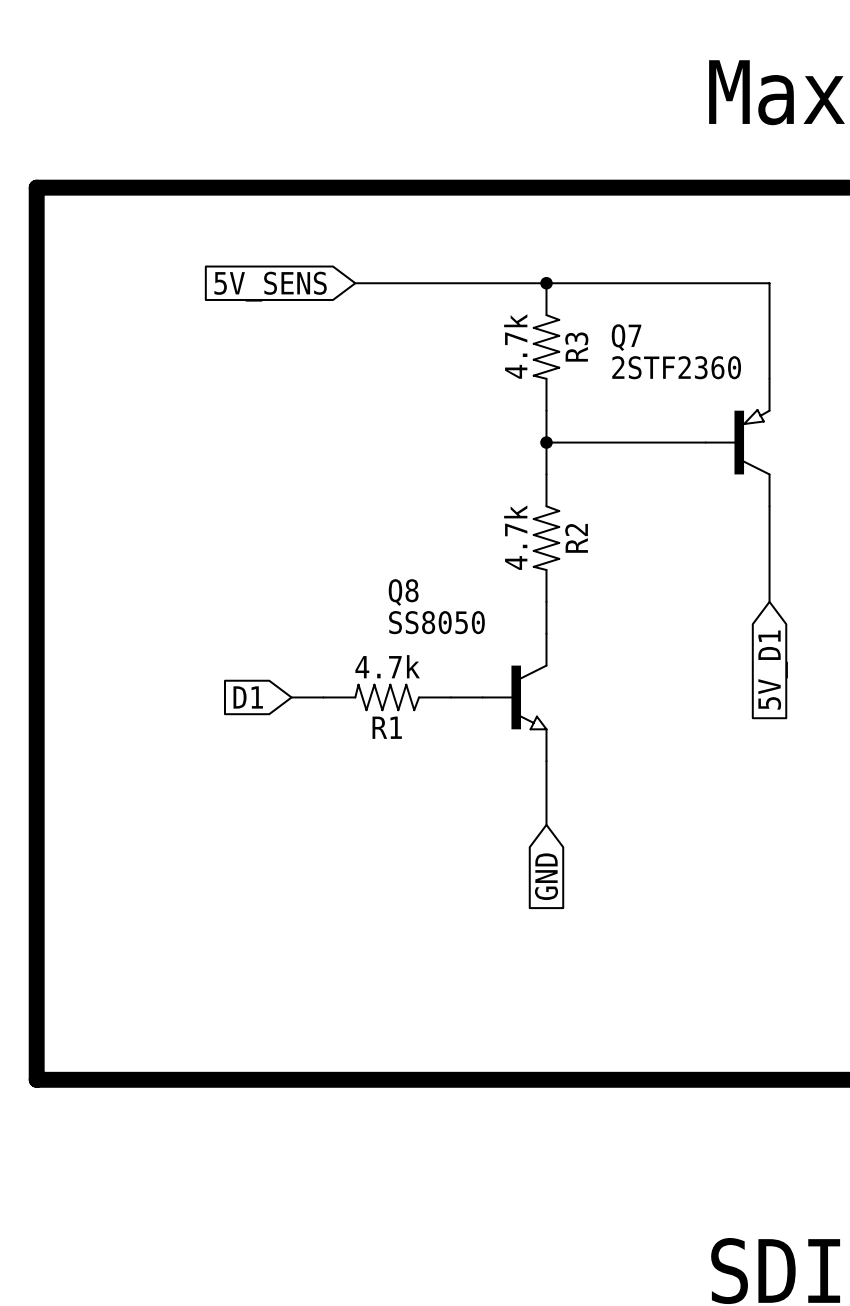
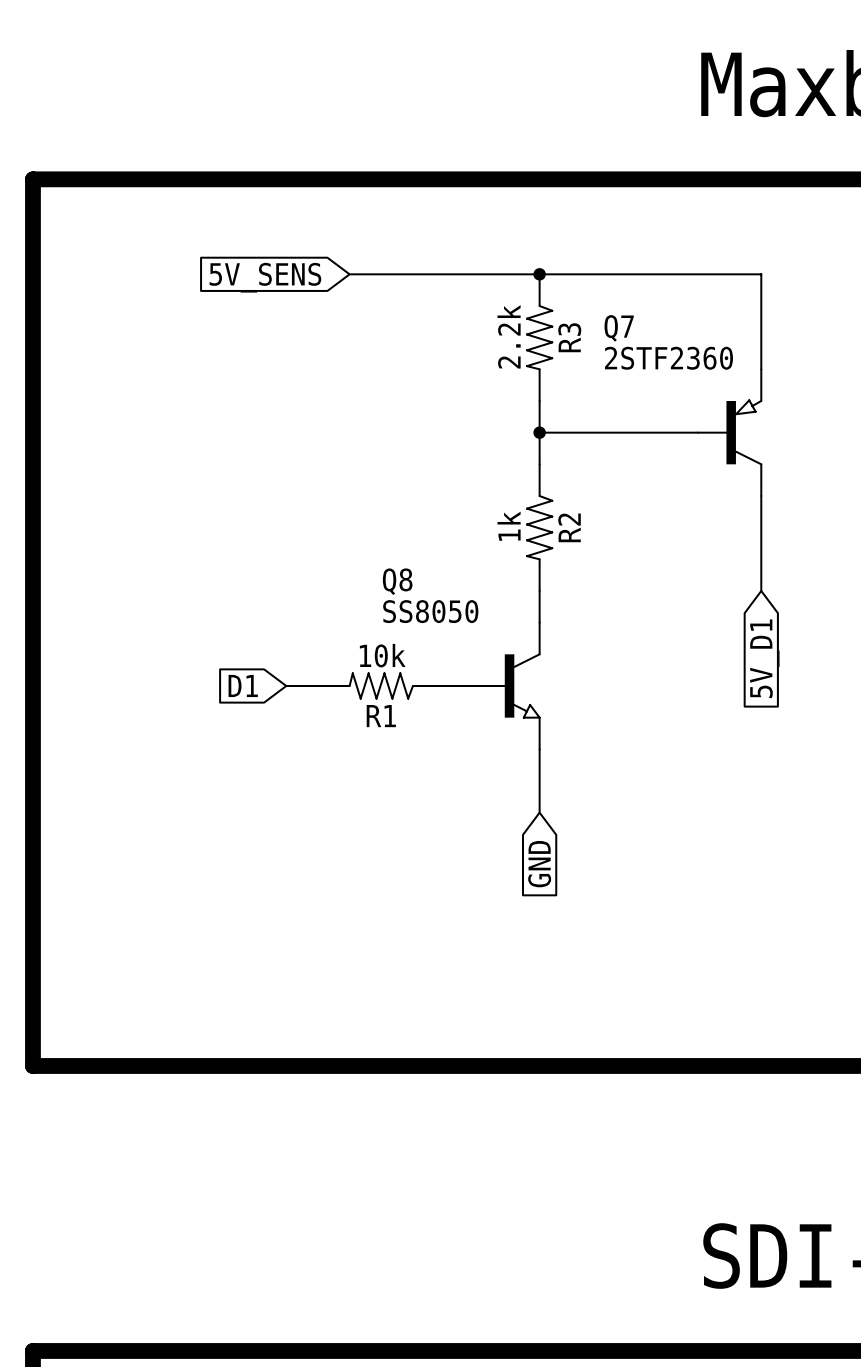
R3 value: 4.7k (515, 346) -> 2.2k (509, 336)
R2 value: 4.7k (515, 537) -> 1k (509, 526)
R1 value: 4.7k (387, 666) -> 10k (382, 655)

